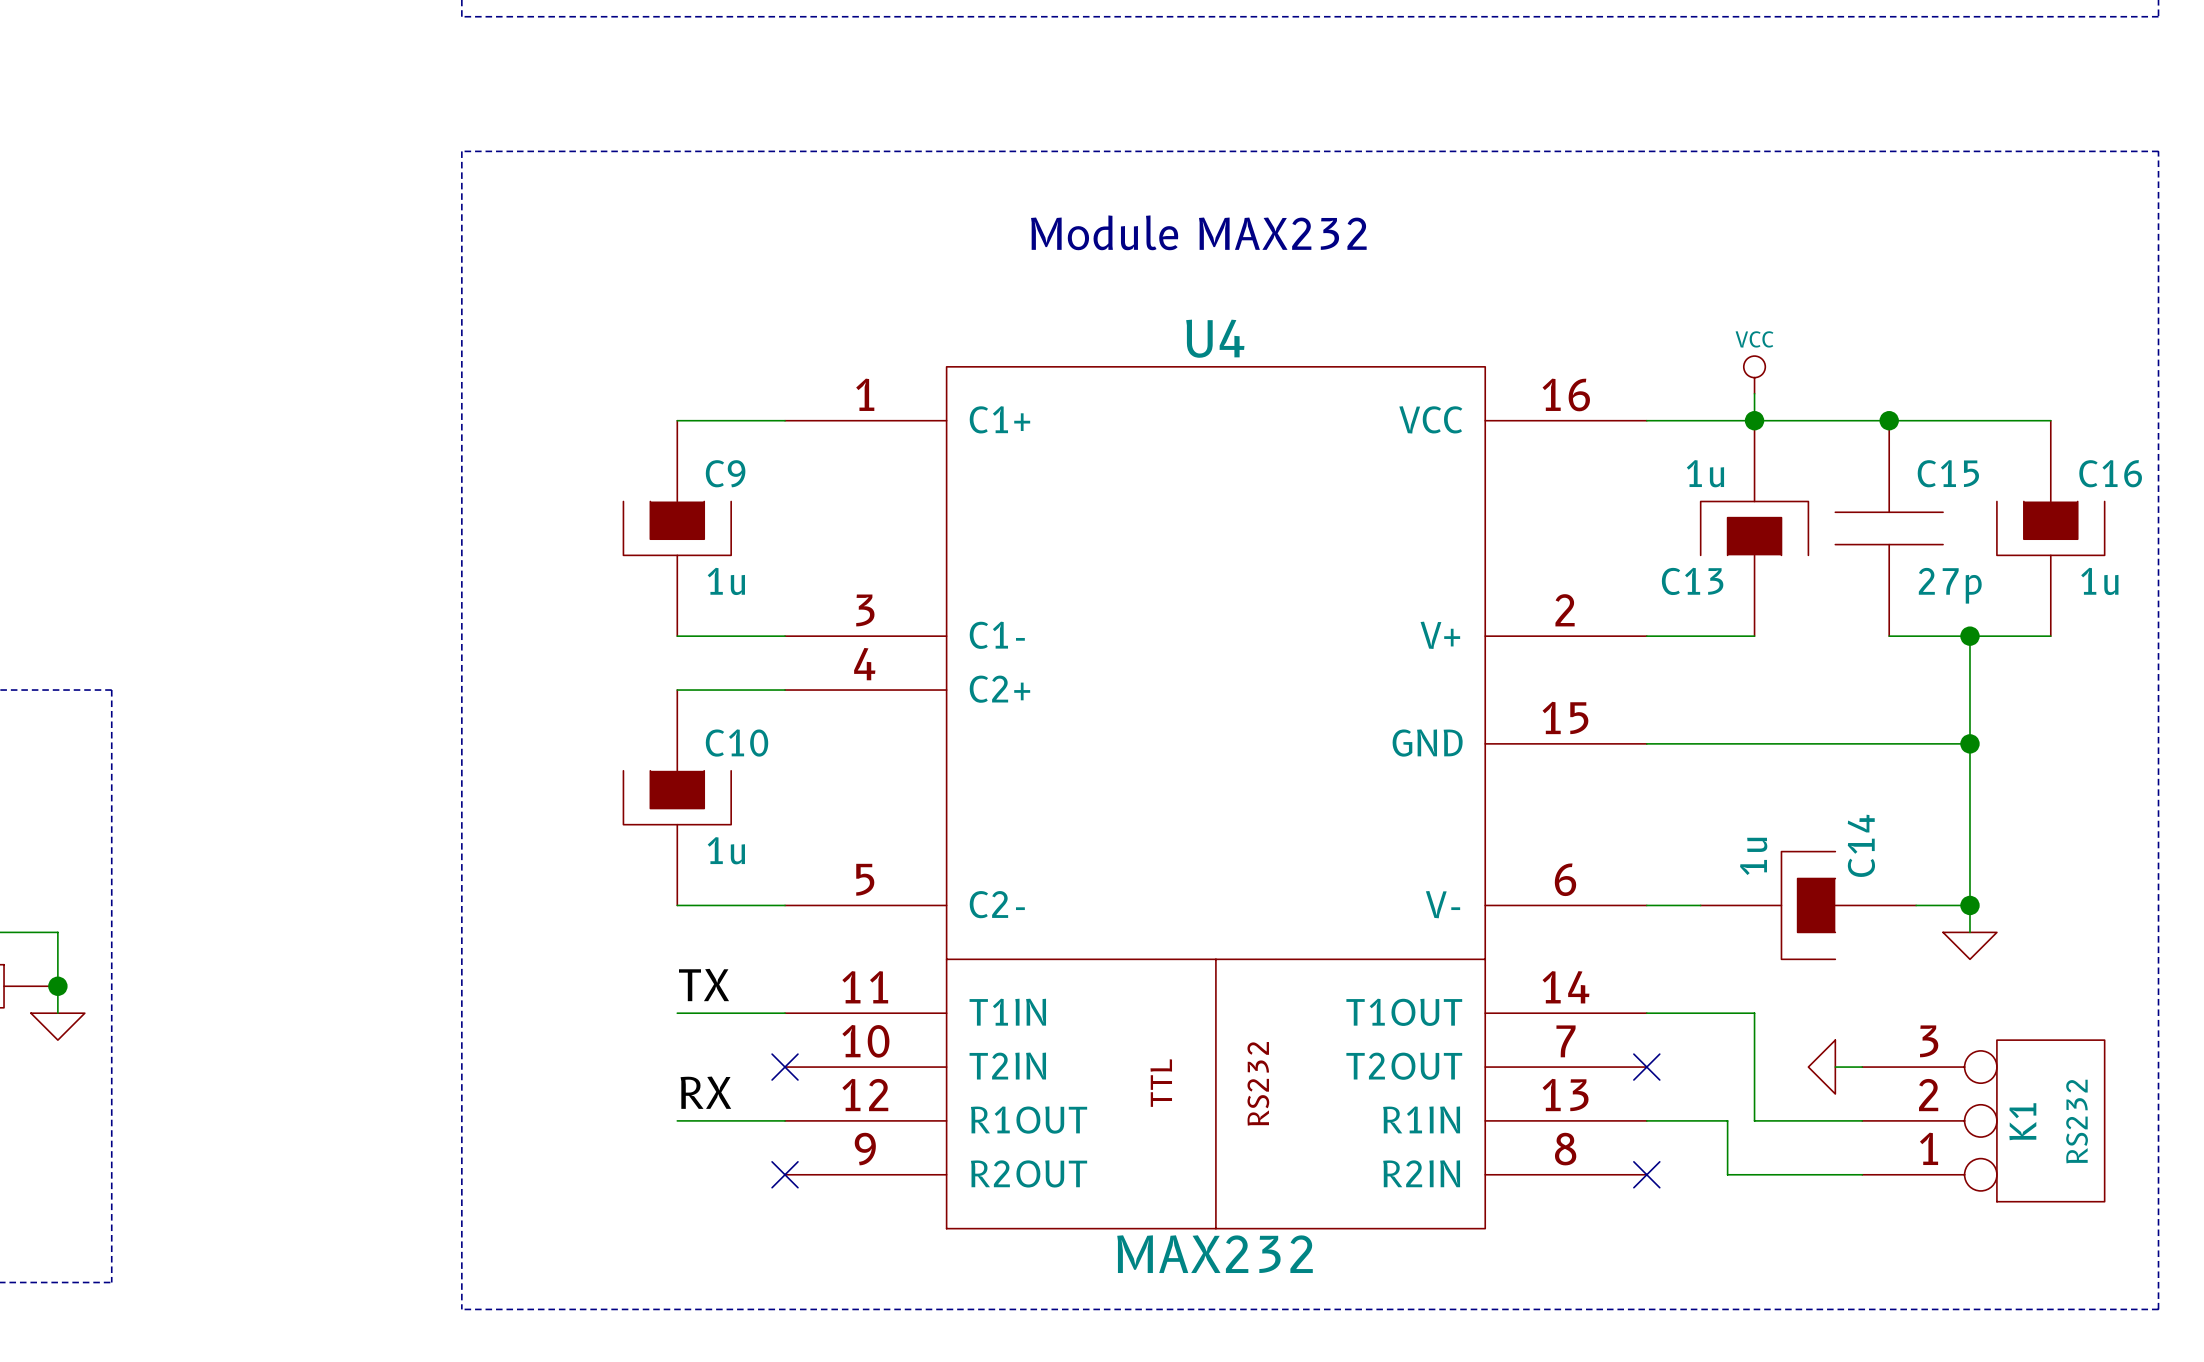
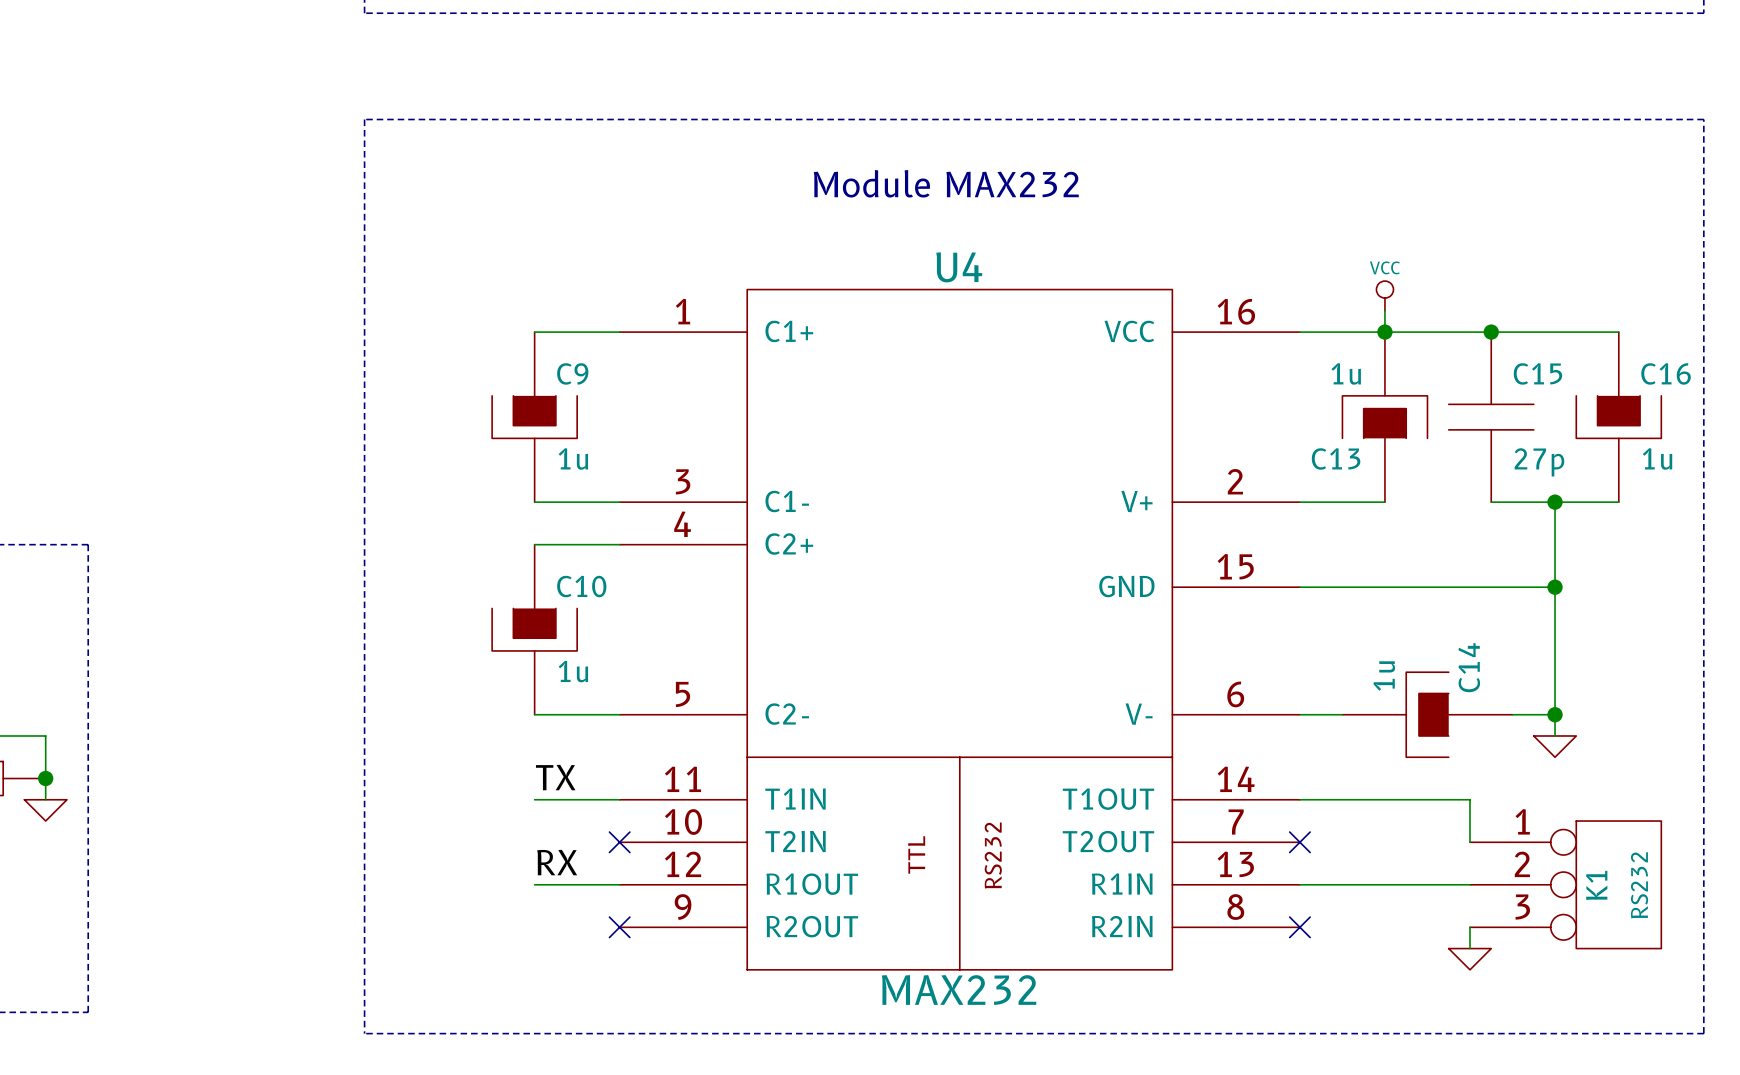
wire: (1754, 1013) (1754, 1120) -> (1363, 884) (1384, 884)
power symbol rotation: 0° (1821, 1067) -> 90° counterclockwise (1469, 959)
power symbol position: (1821, 1067) -> (1469, 959)
wire: (1835, 1067) (1862, 1067) -> (1384, 799) (1469, 799) (1469, 842)
wire: (1727, 1120) (1727, 1174) (1862, 1174) -> (1469, 948) (1469, 927)
K1 flip: as is (2050, 1120) -> up-down (1618, 884)

